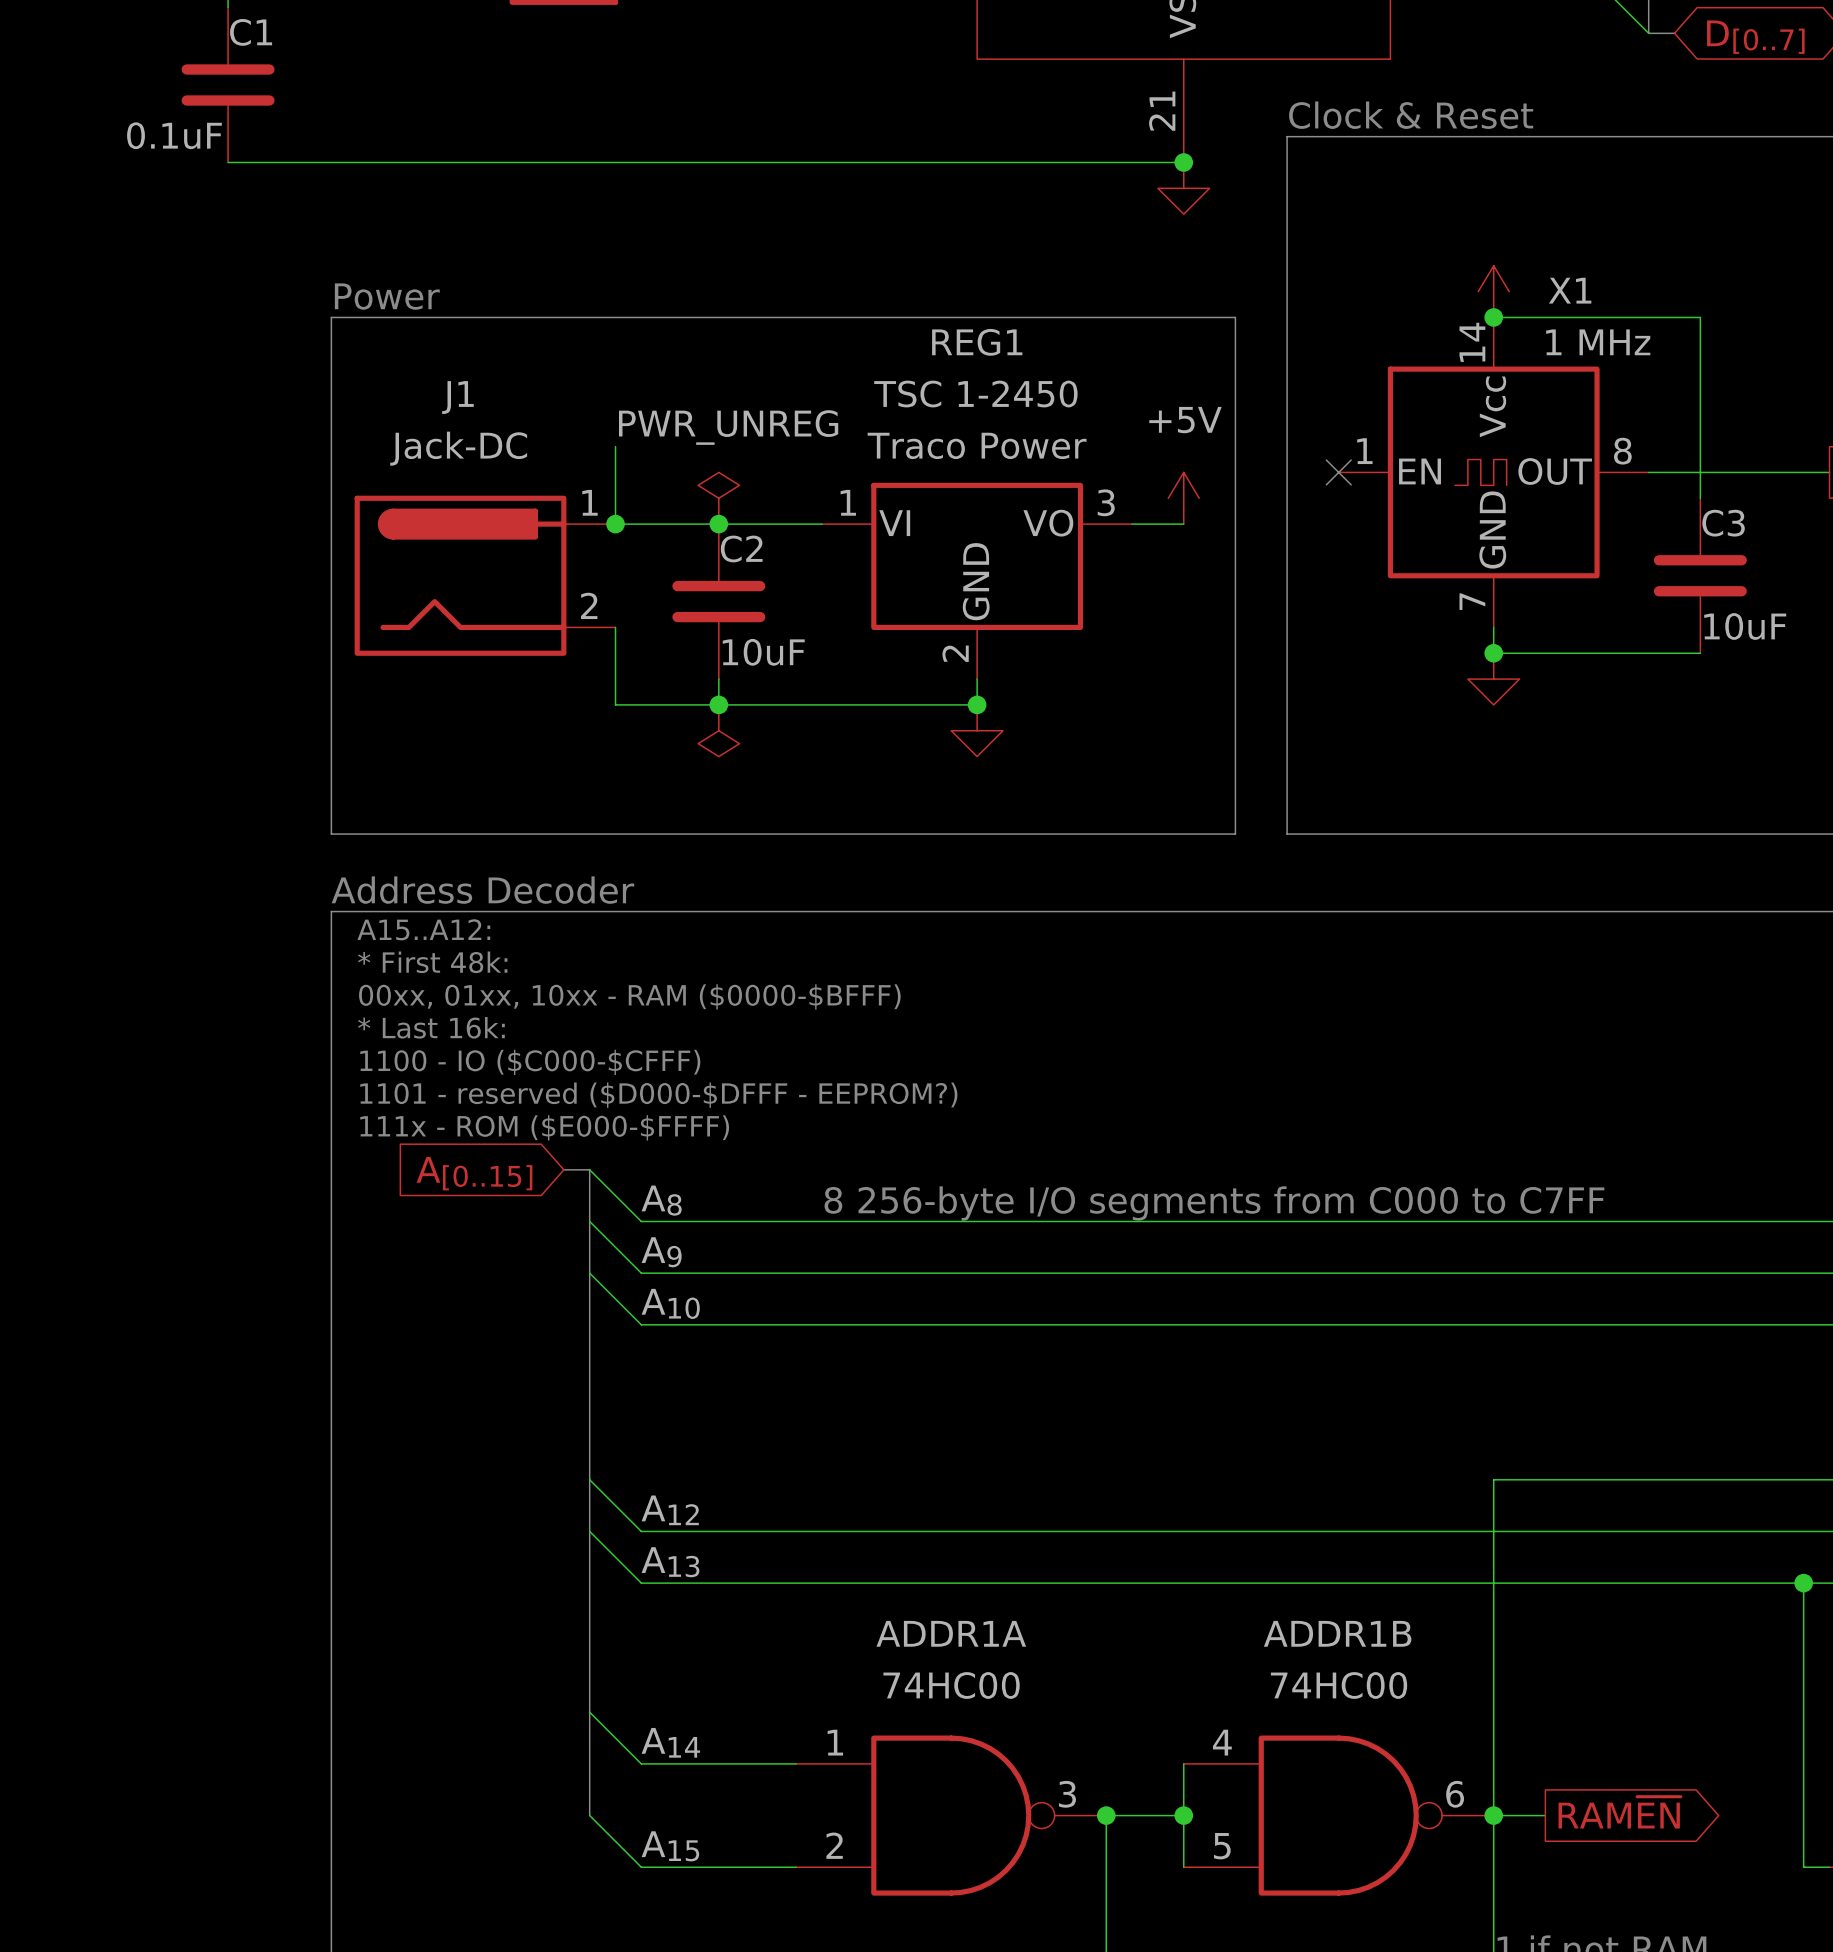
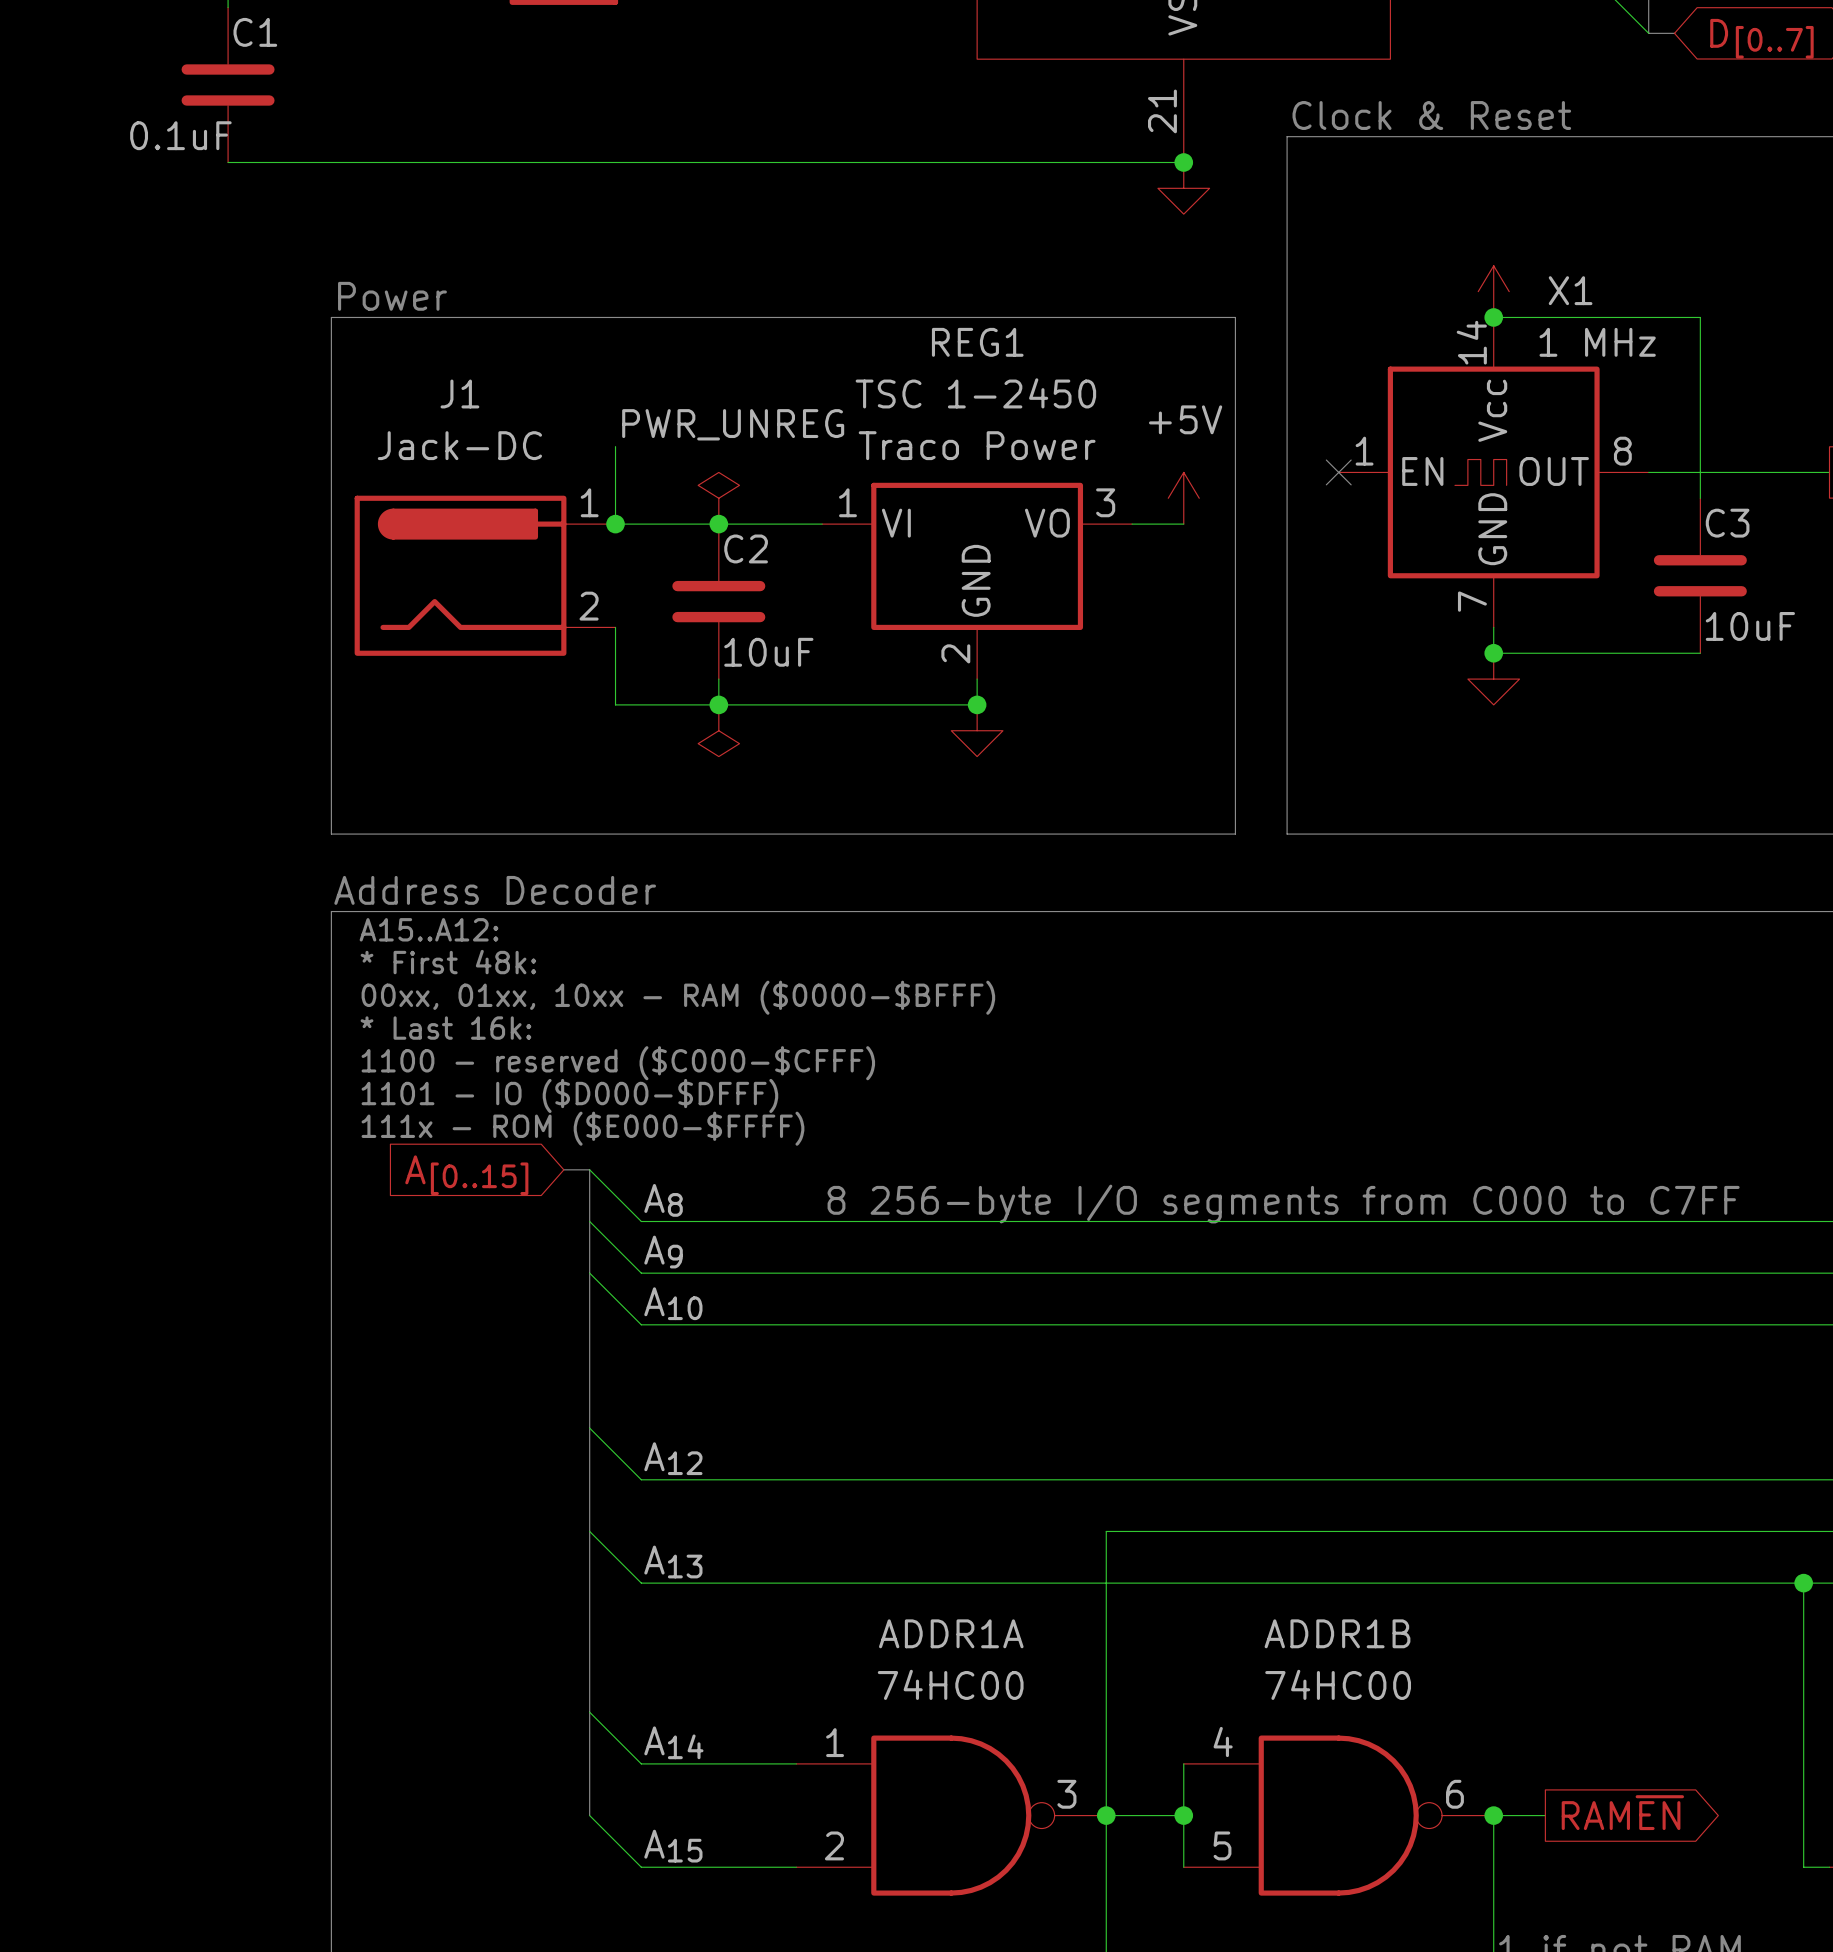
text: 1100 - IO ($C000-$CFFF) (530, 1062) -> 1100 - reserved ($C000-$CFFF) (618, 1063)
text: 1101 - reserved ($D000-$DFFF - EEPROM?) (658, 1095) -> 1101 - IO ($D000-$DFFF) (569, 1095)
wire: (589, 1479) (641, 1531) (1106, 1531) -> (1106, 1815) (1106, 1531)
wire: (1493, 1479) (1493, 1815) -> (1493, 1479) (641, 1479) (589, 1428)
label position: A12 (670, 1510) -> A12 (673, 1458)

